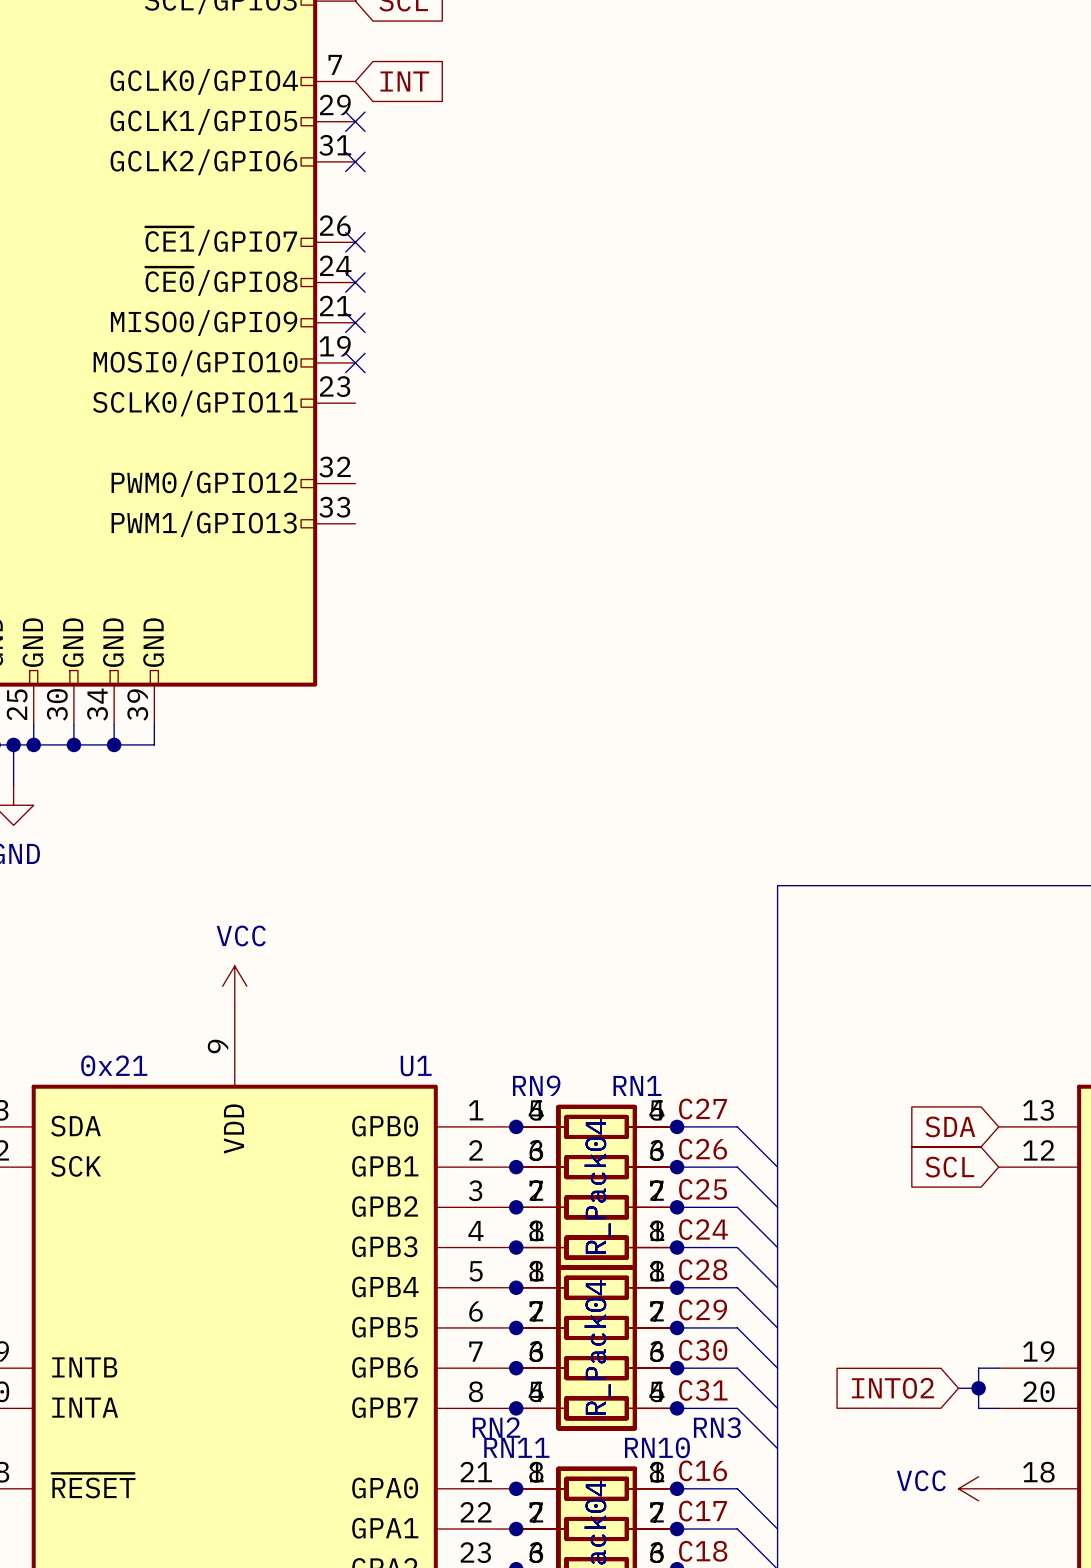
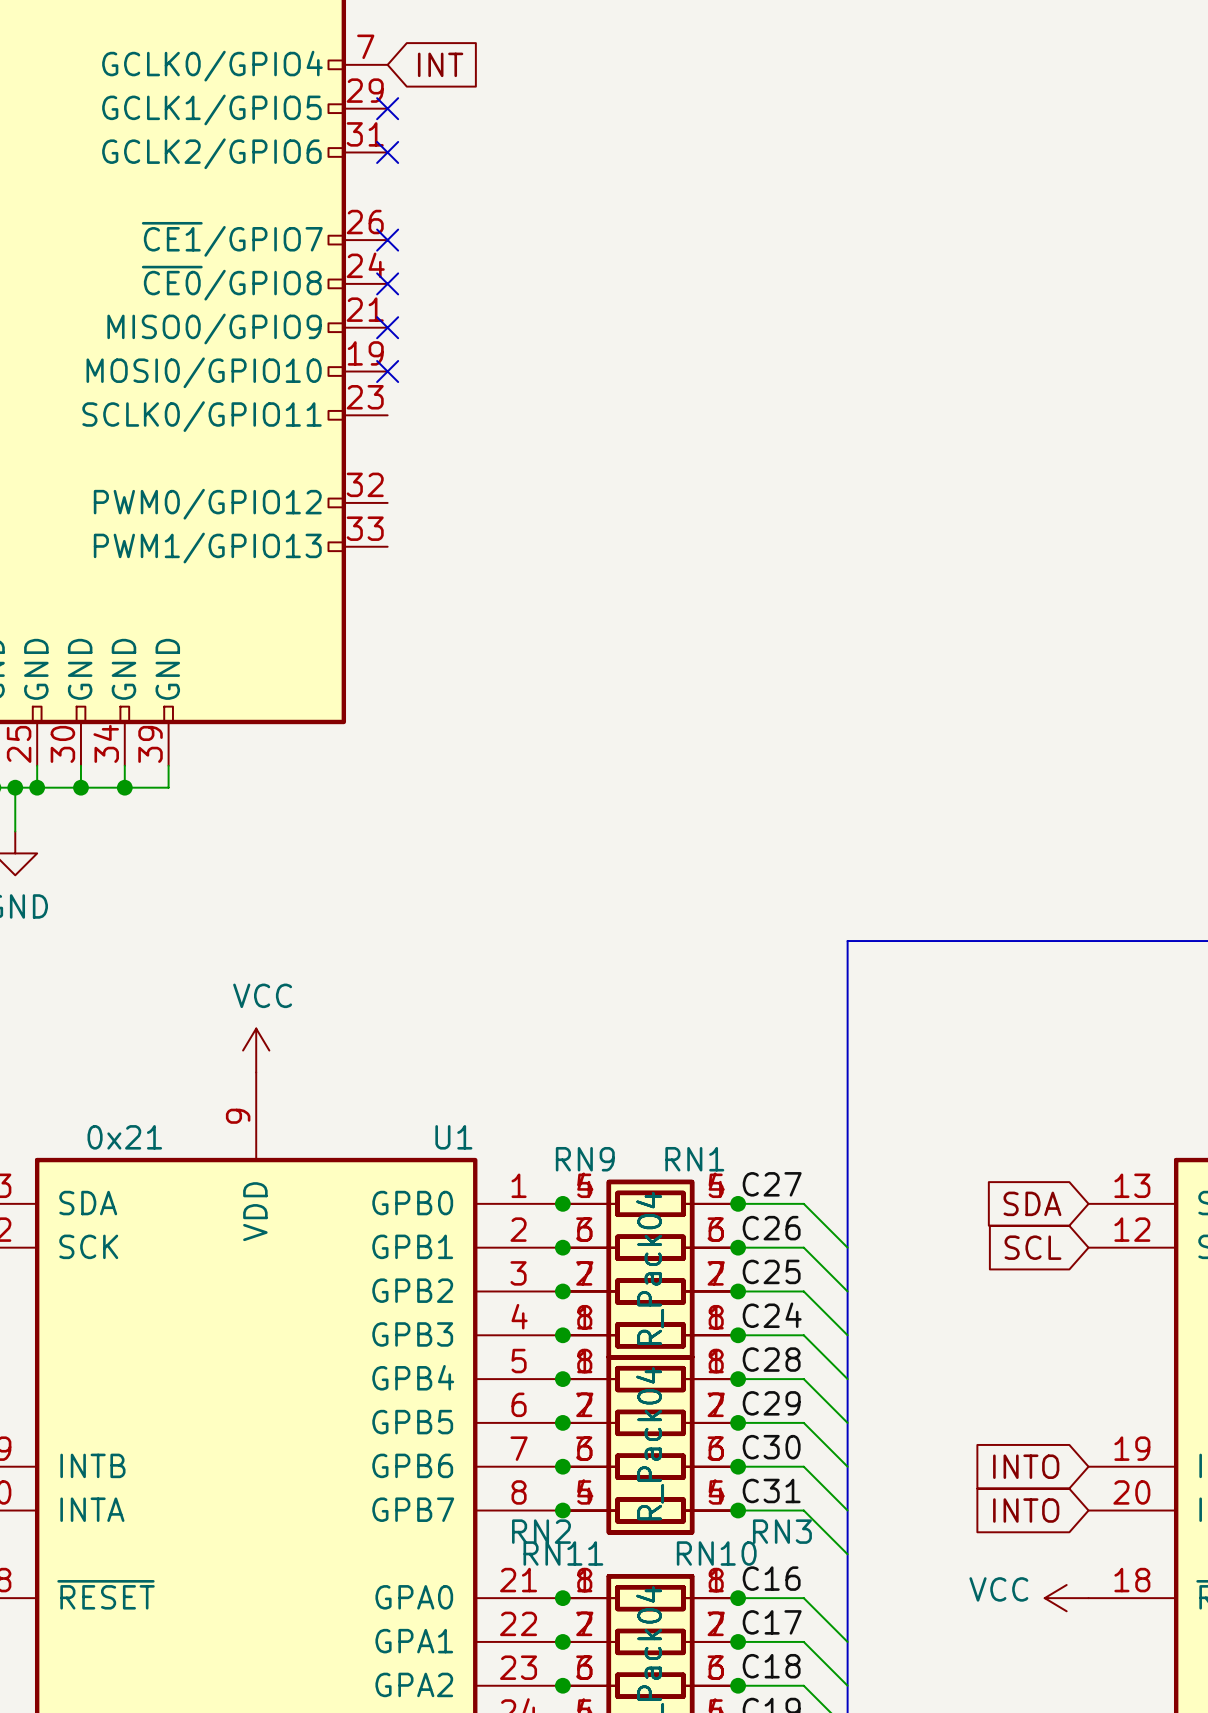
global label: none -> INTO (1026, 1466)
wire: (998, 1368) (978, 1368) (978, 1408) (998, 1408) -> none
global label: INTO2 (892, 1388) -> none
junction: (978, 1388) -> none
global label: none -> INTO (1026, 1510)

